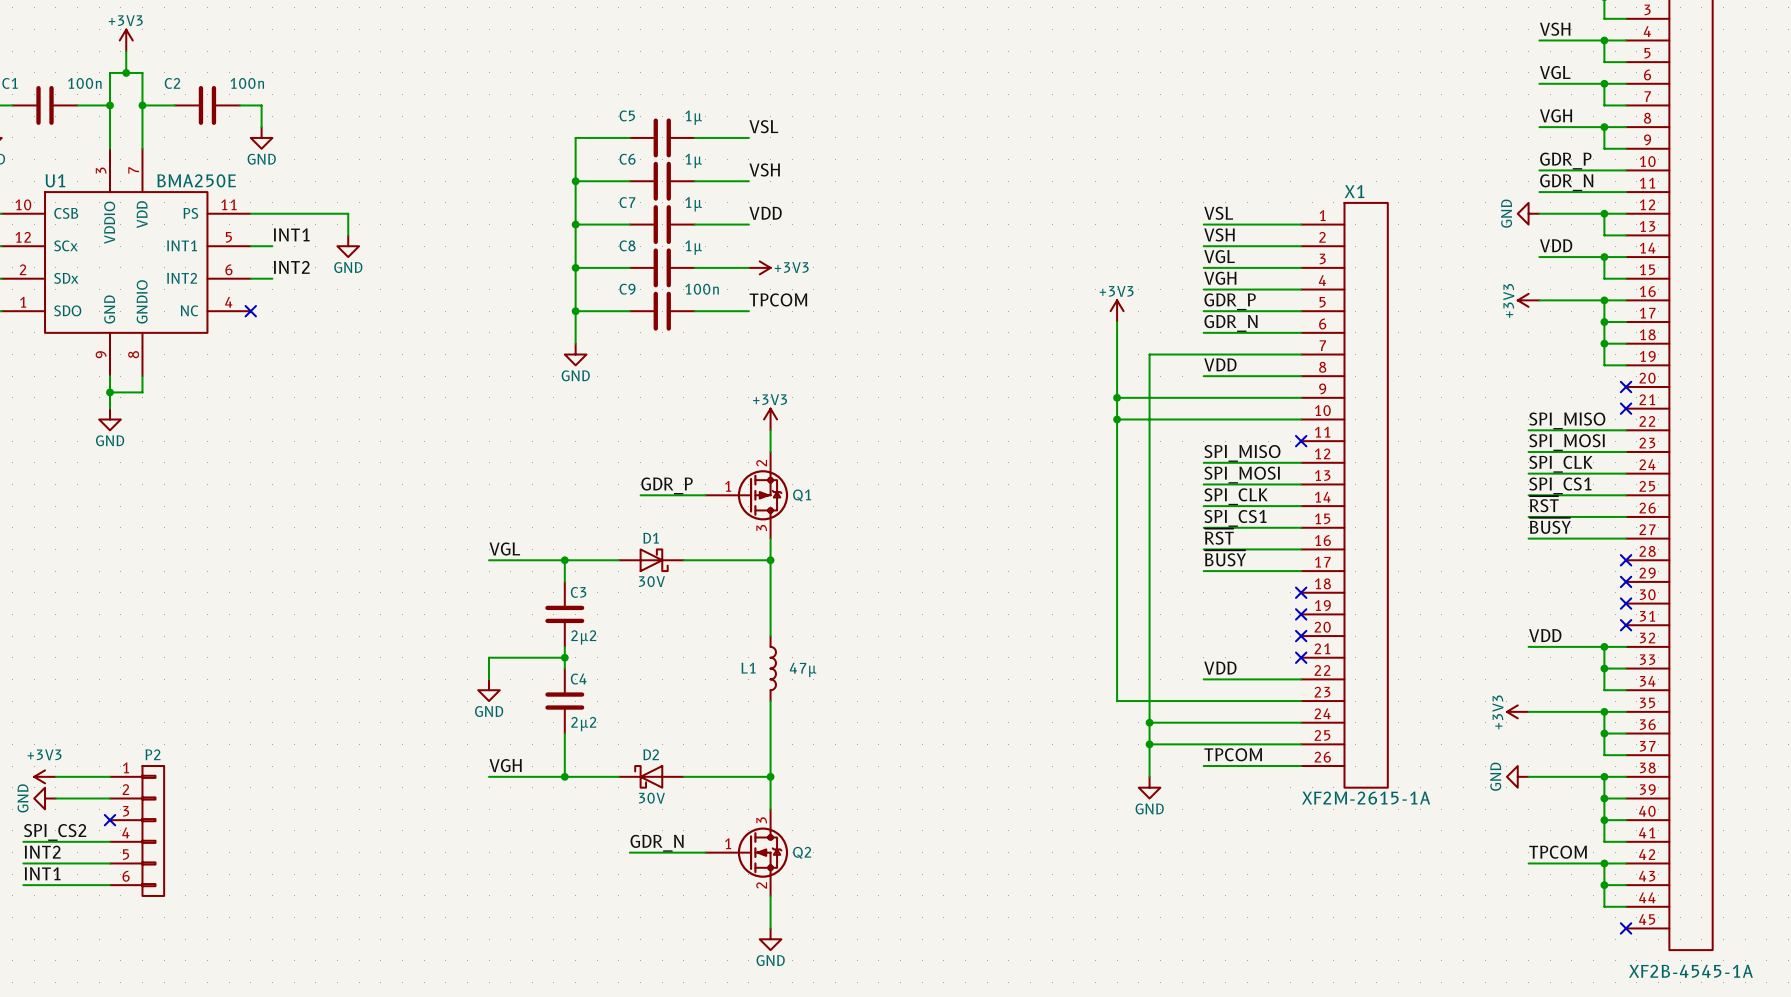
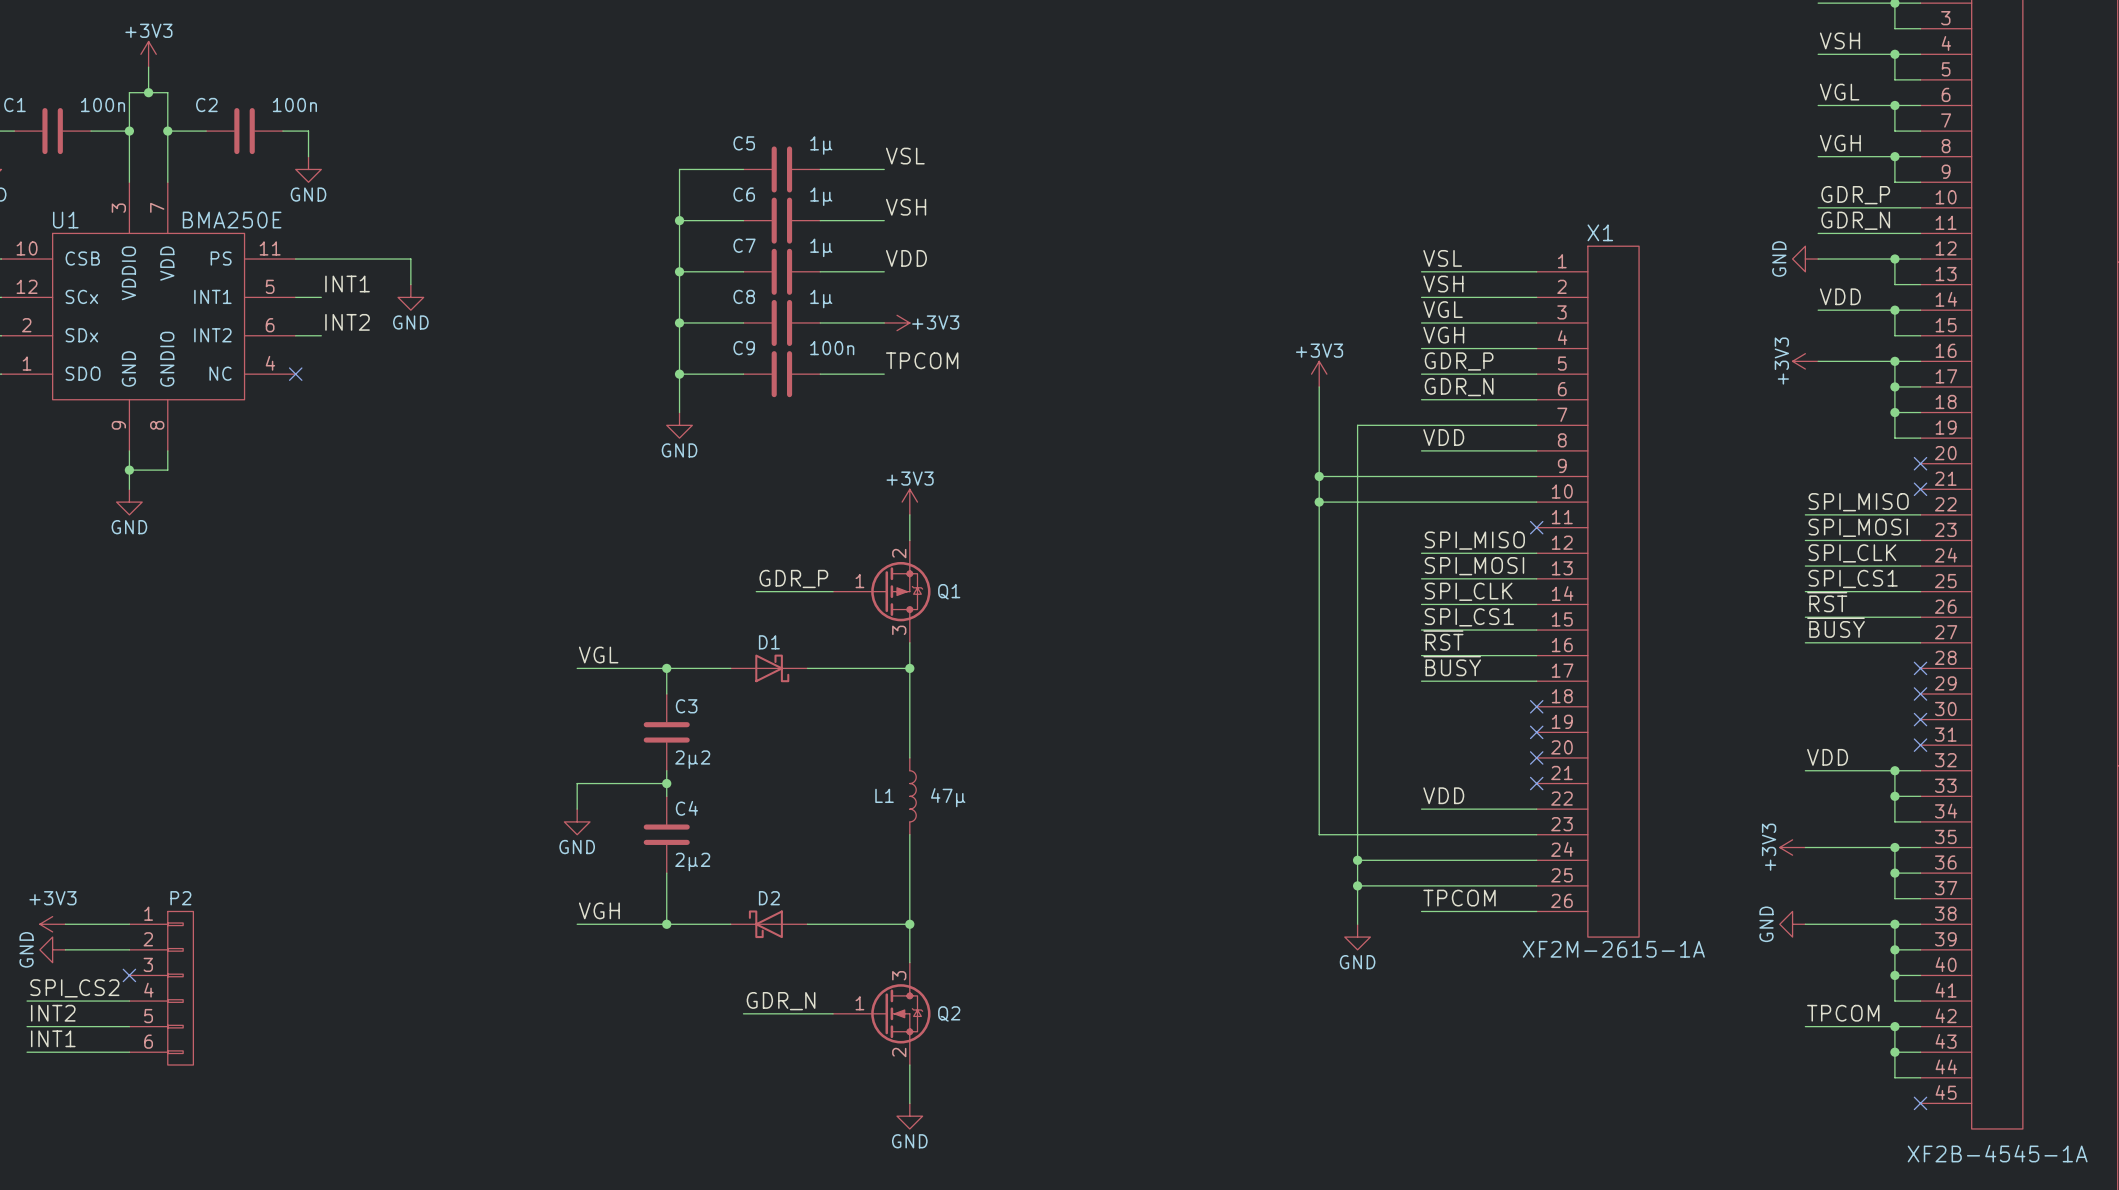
D1 value: 30V (651, 581) -> none
D2 value: 30V (651, 798) -> none

